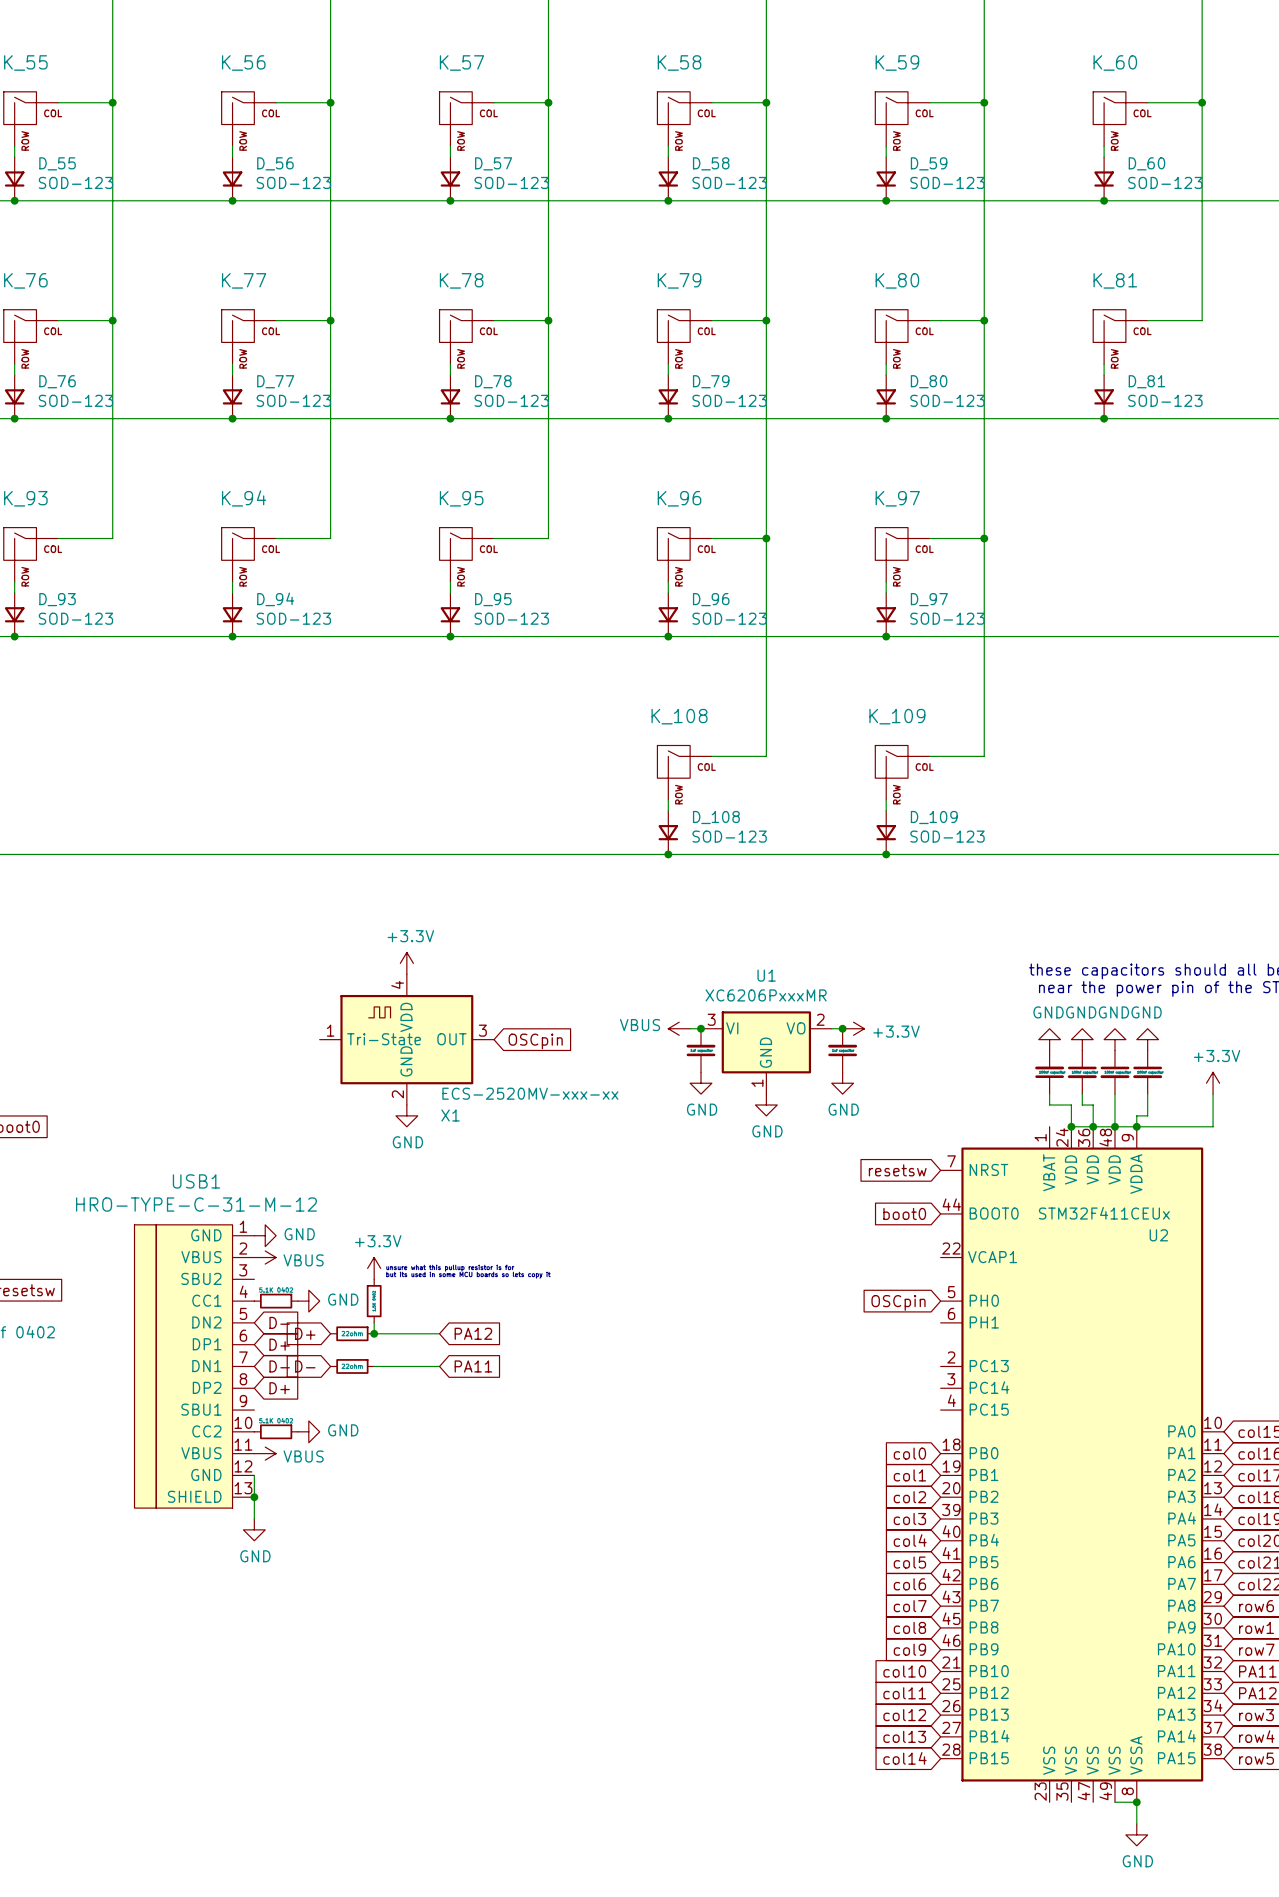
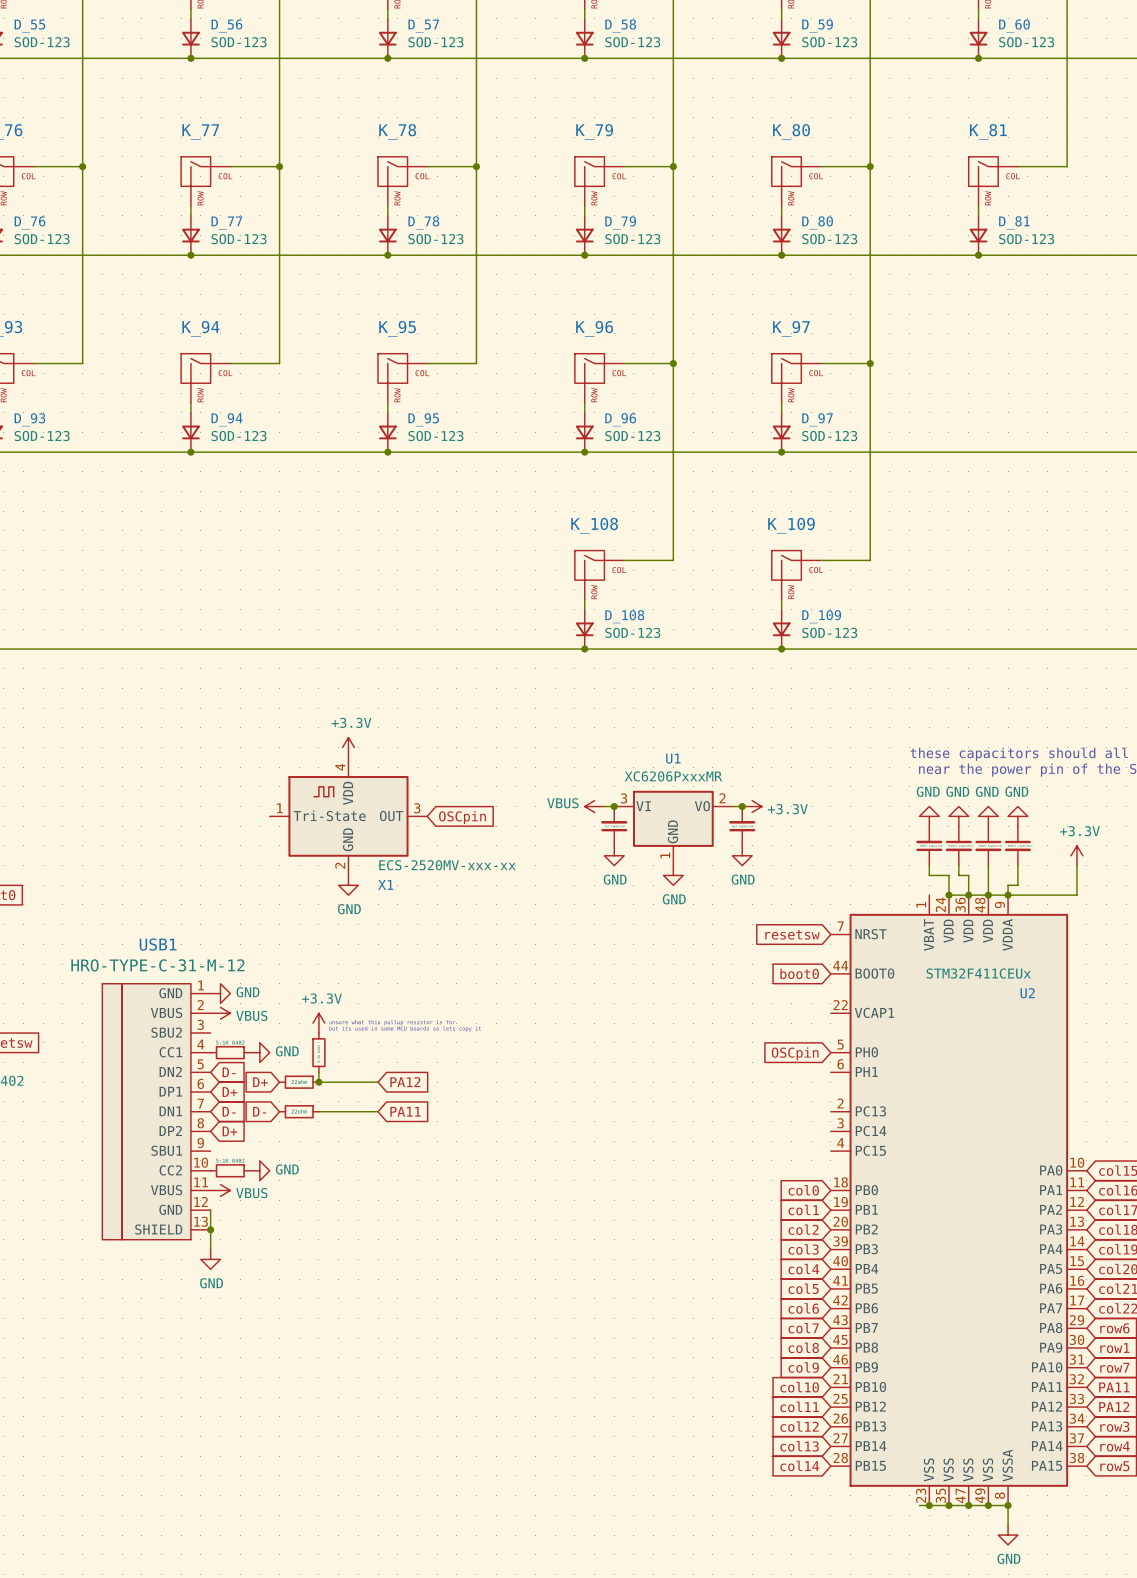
wire: none -> (919, 1505) (988, 1505)
junction: none -> (929, 1505)
junction: none -> (948, 1505)
junction: none -> (968, 1505)
junction: none -> (988, 1505)

